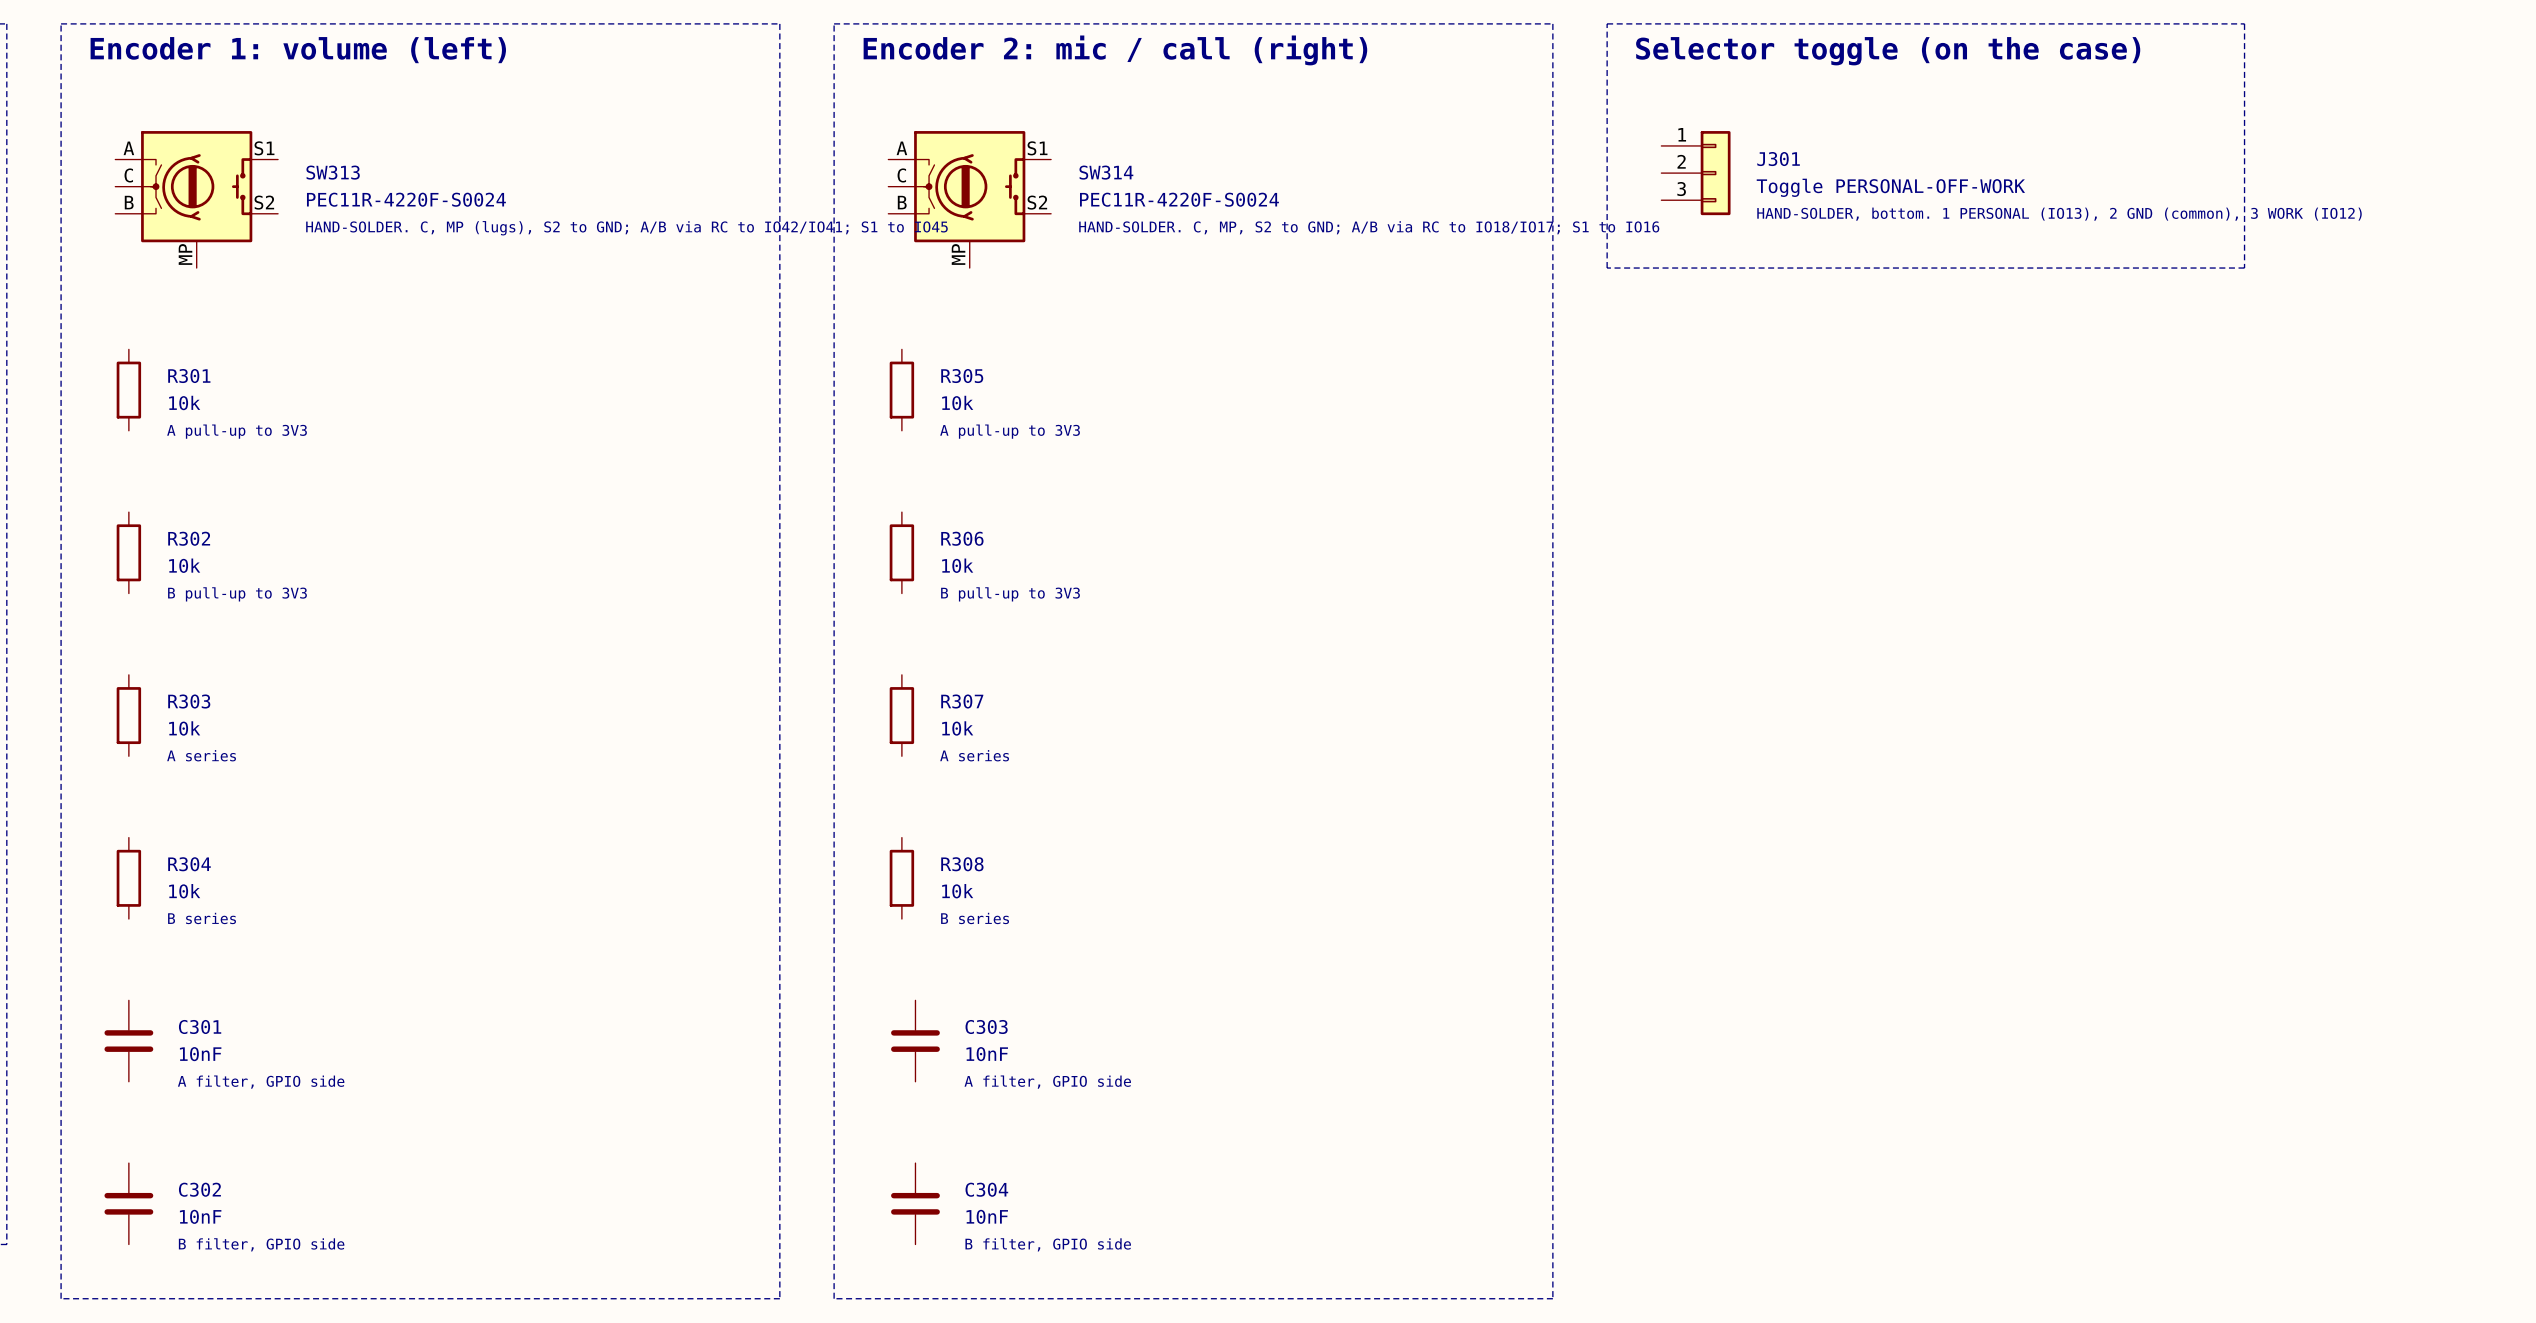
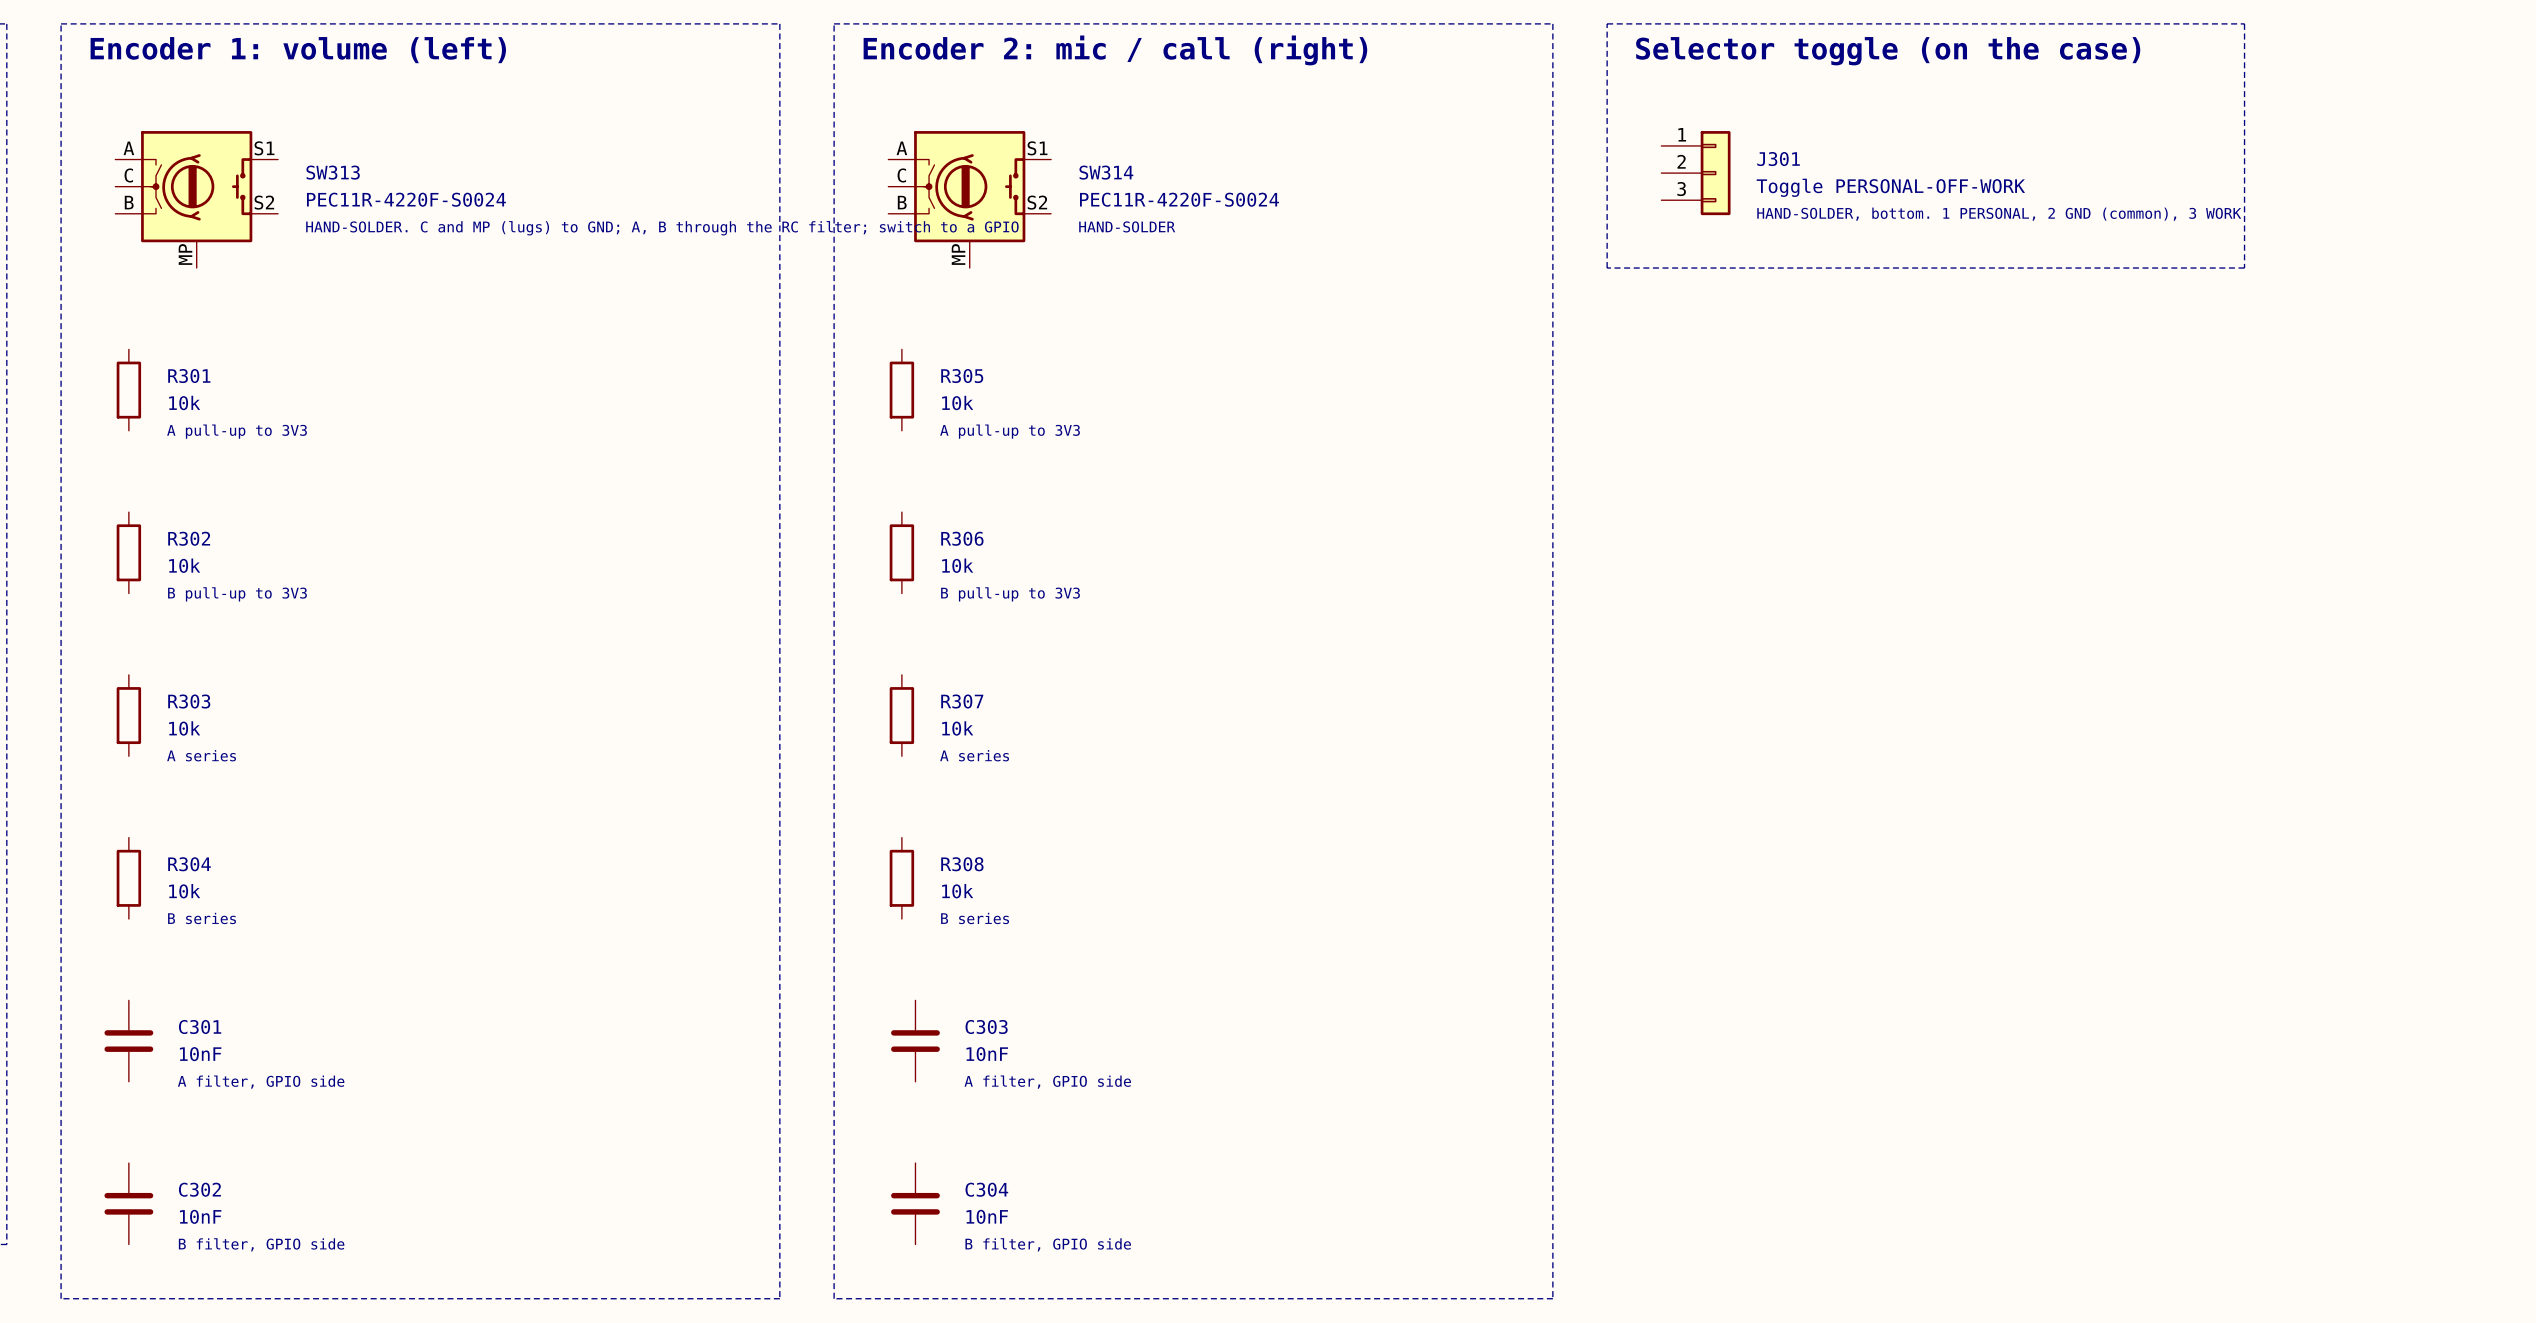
J301 text: HAND-SOLDER, bottom. 1 PERSONAL (IO13), 2 GND (common), 3 WORK (IO12) (2059, 214) -> HAND-SOLDER, bottom. 1 PERSONAL, 2 GND (common), 3 WORK (1999, 214)
SW314 text: HAND-SOLDER. C, MP, S2 to GND; A/B via RC to IO18/IO17; S1 to IO16 (1369, 227) -> HAND-SOLDER (1127, 226)
SW313 text: HAND-SOLDER. C, MP (lugs), S2 to GND; A/B via RC to IO42/IO41; S1 to IO45 (626, 228) -> HAND-SOLDER. C and MP (lugs) to GND; A, B through the RC filter; switch to a GPIO (662, 228)

